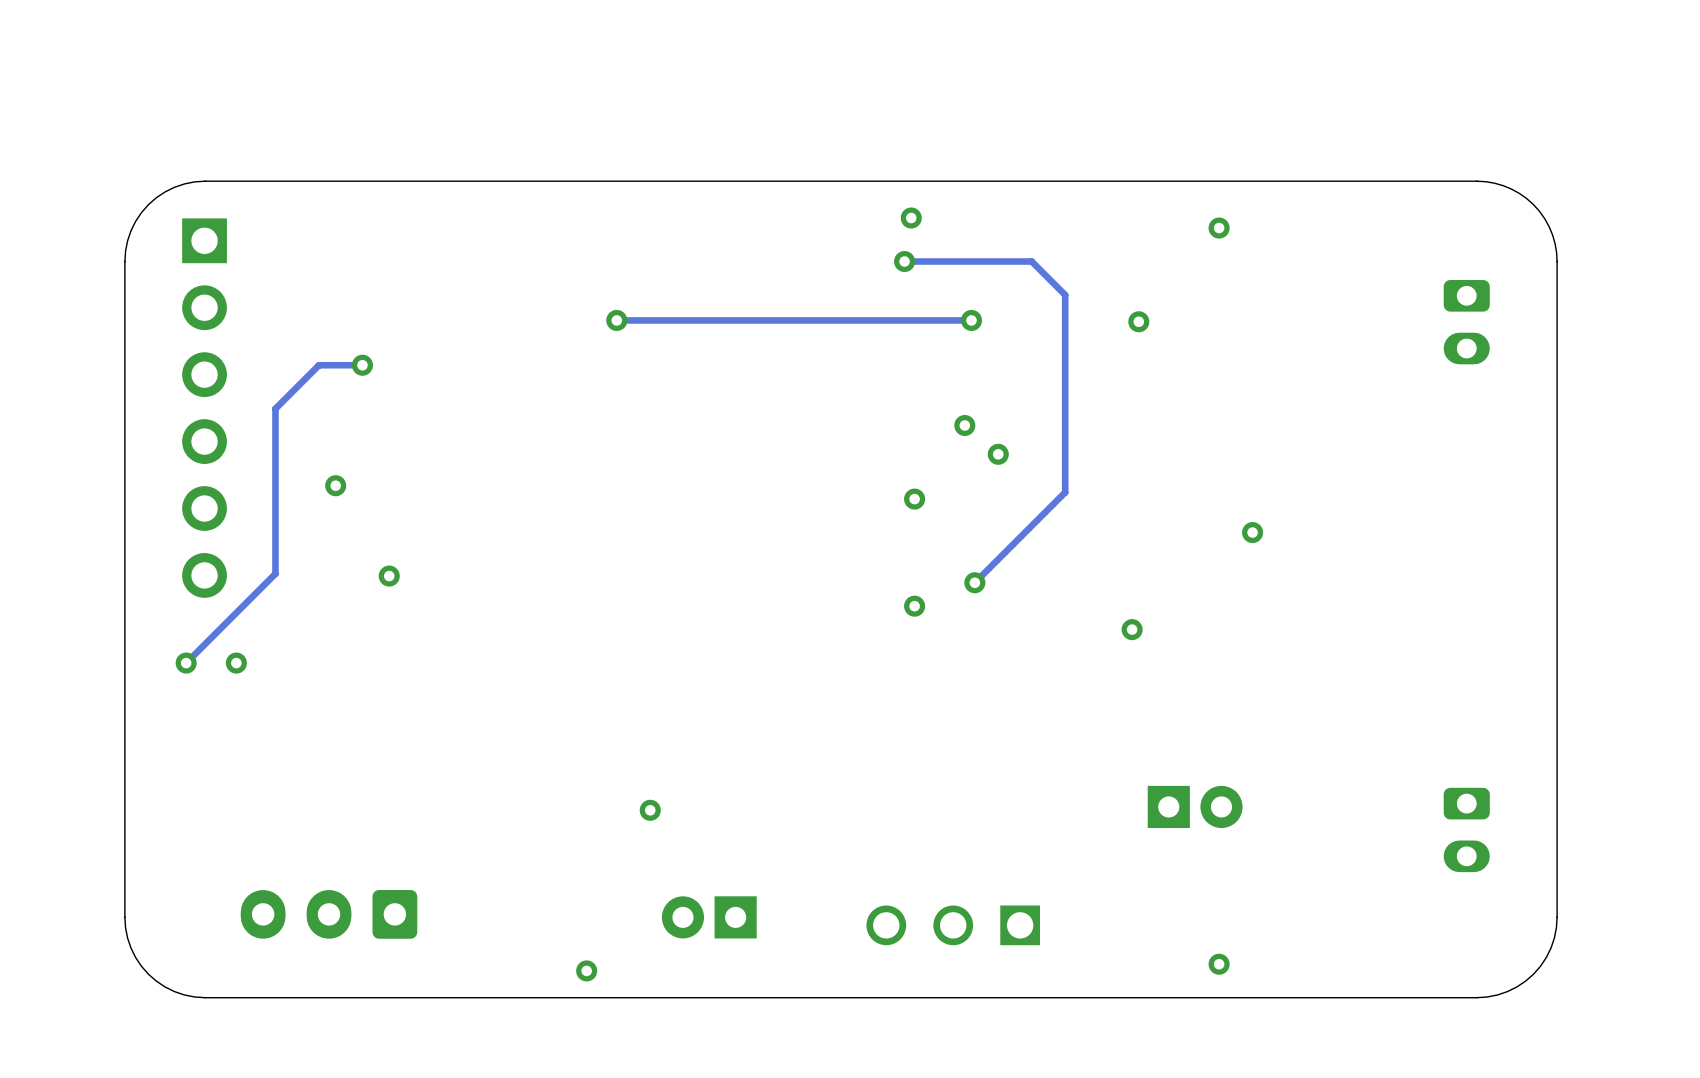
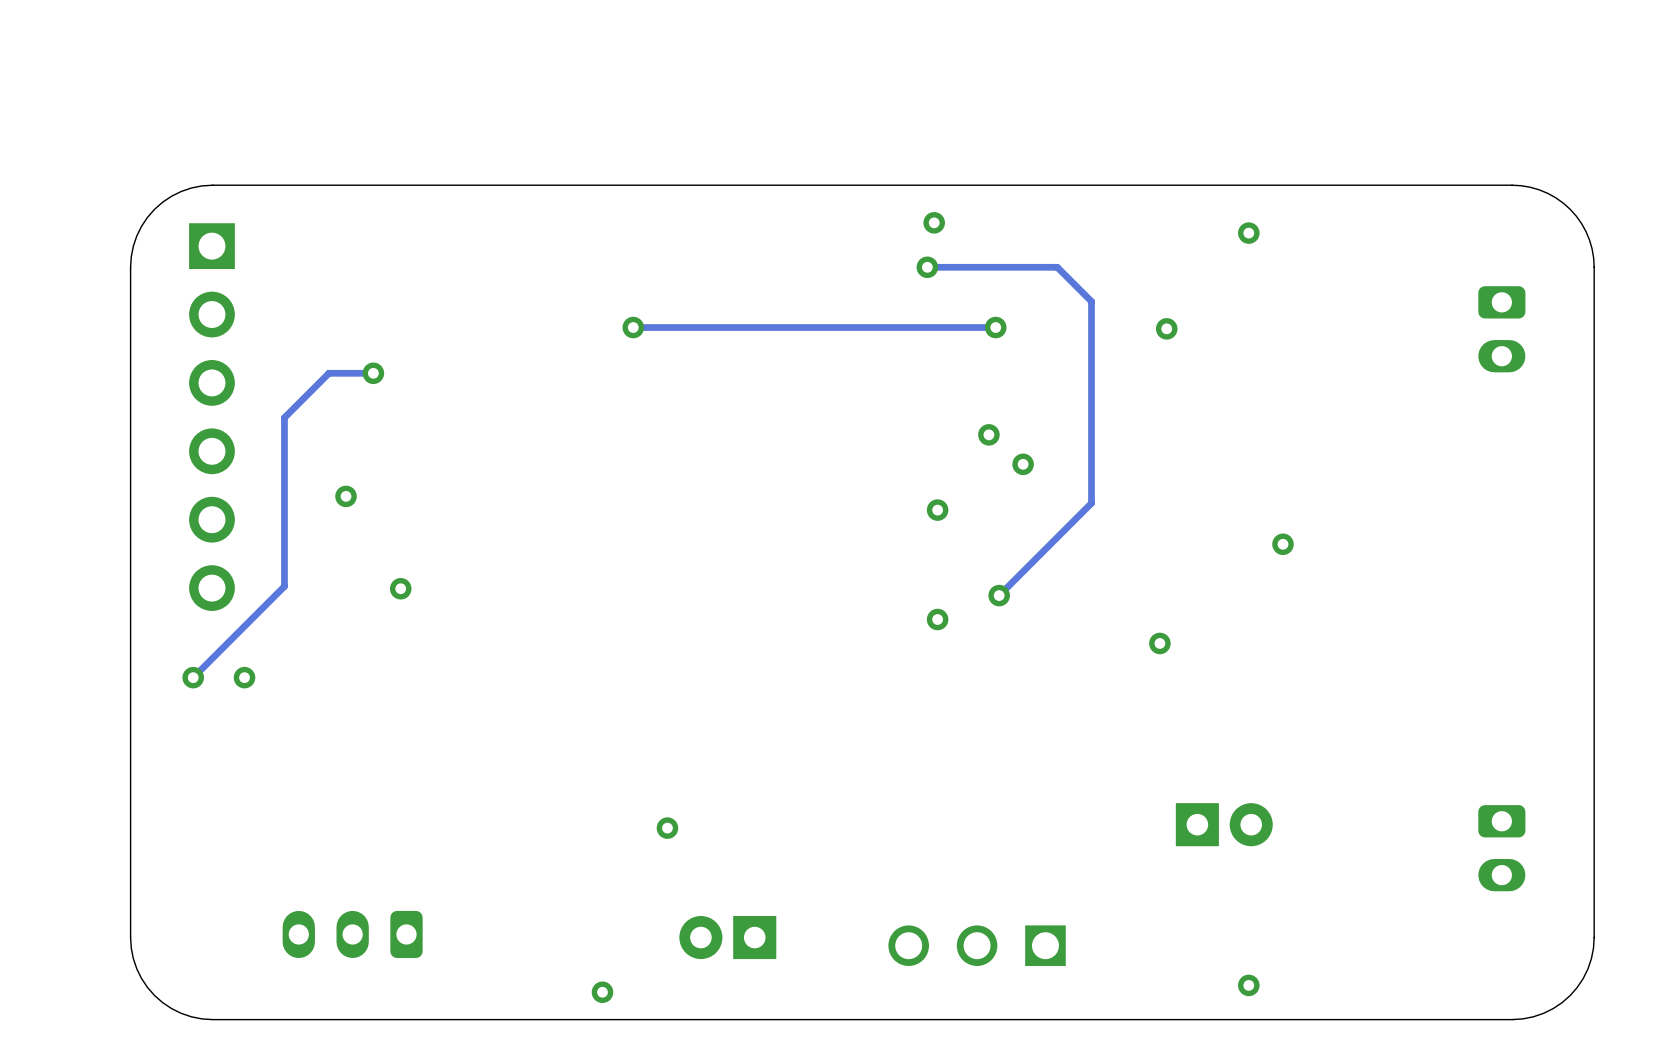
part footprint: [240, 890, 418, 939] -> [282, 910, 423, 959]

